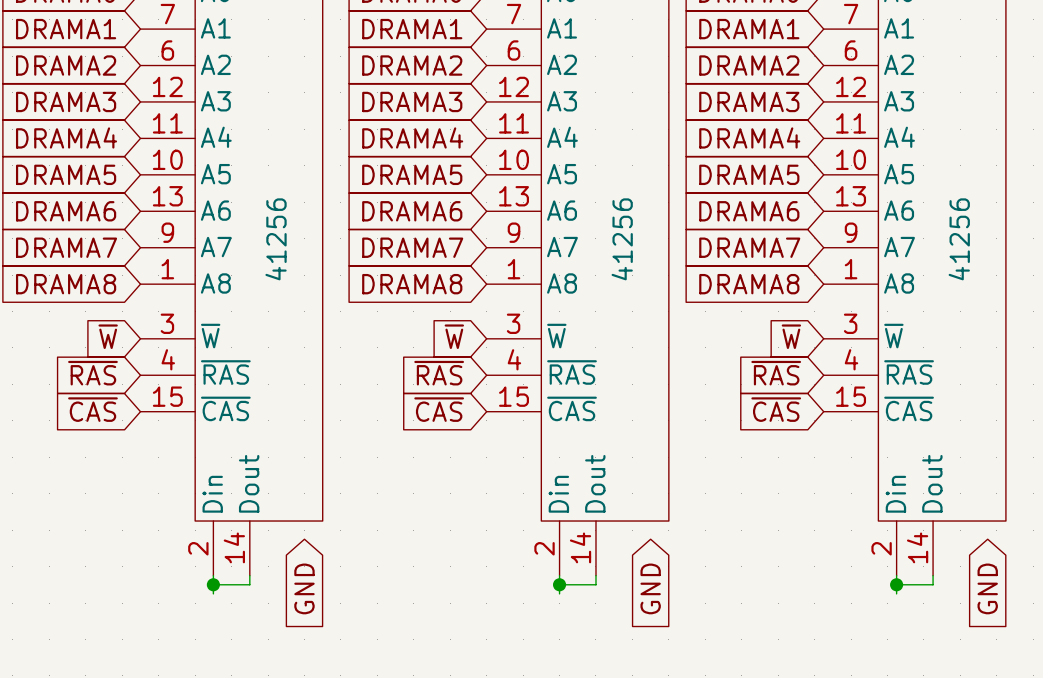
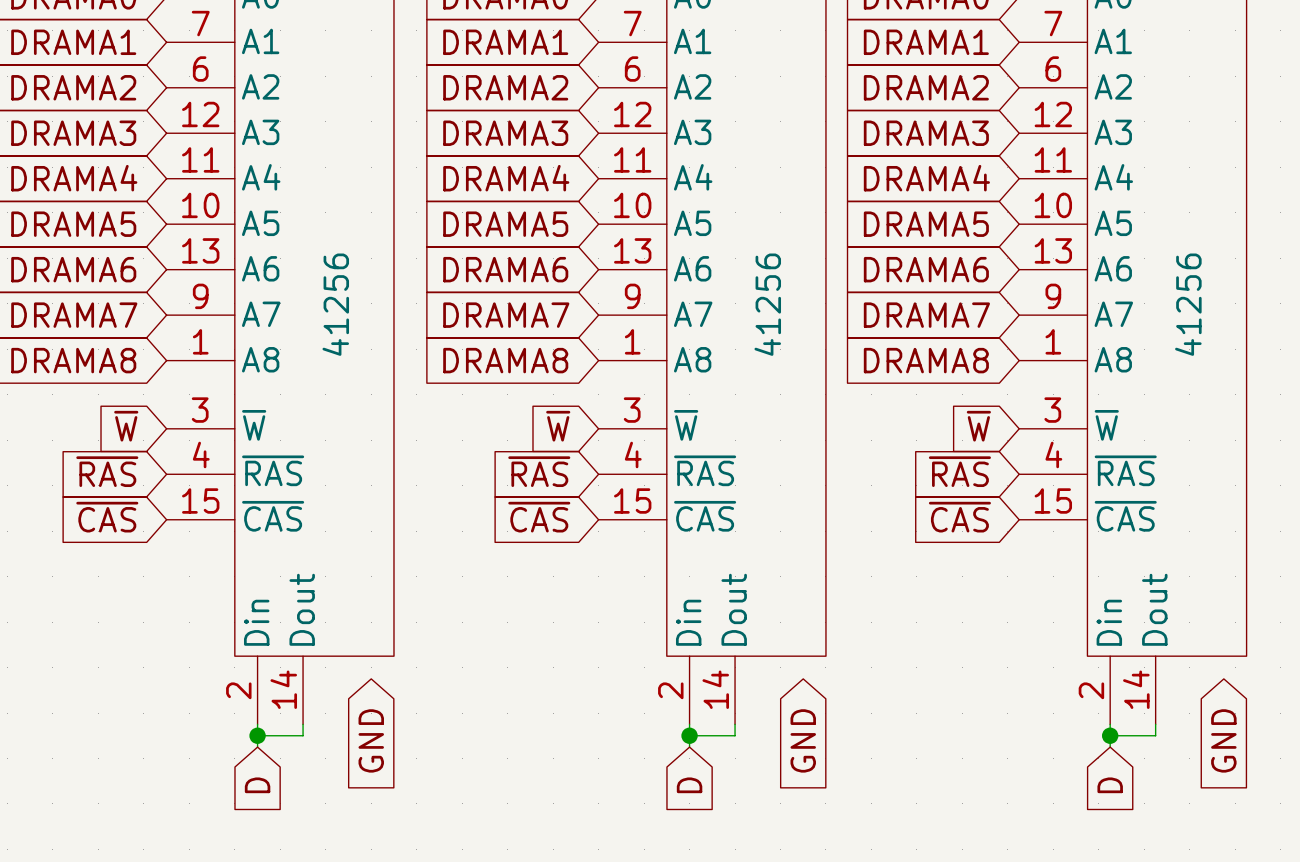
global label: none -> D (257, 785)
global label: none -> D (689, 785)
global label: none -> D (1110, 785)

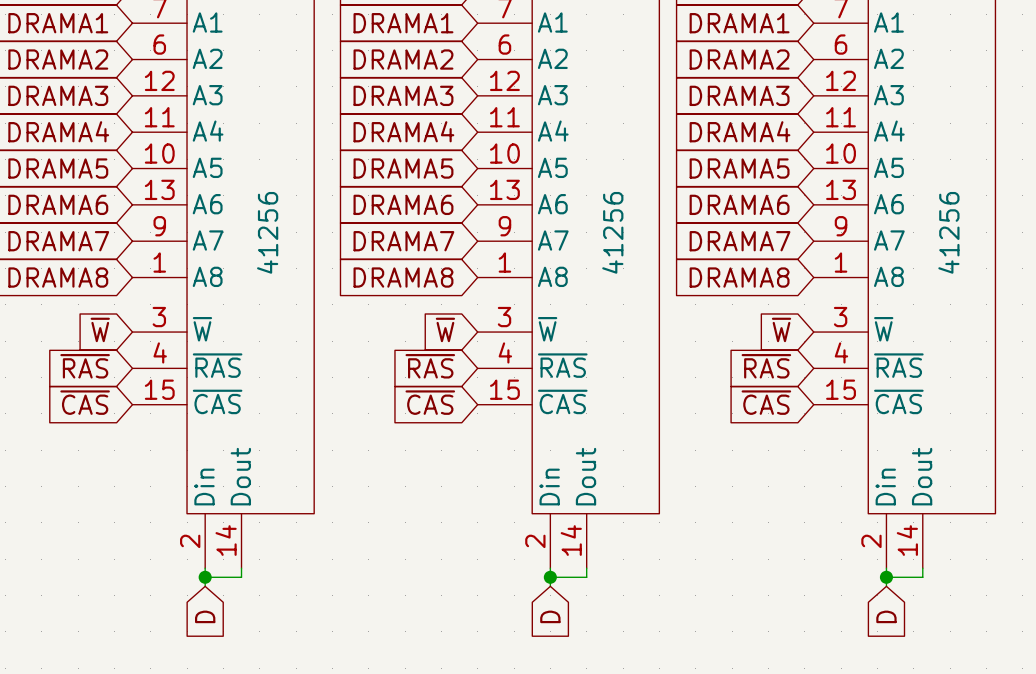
global label: GND (371, 740) -> none
global label: GND (803, 740) -> none
global label: GND (1223, 740) -> none

